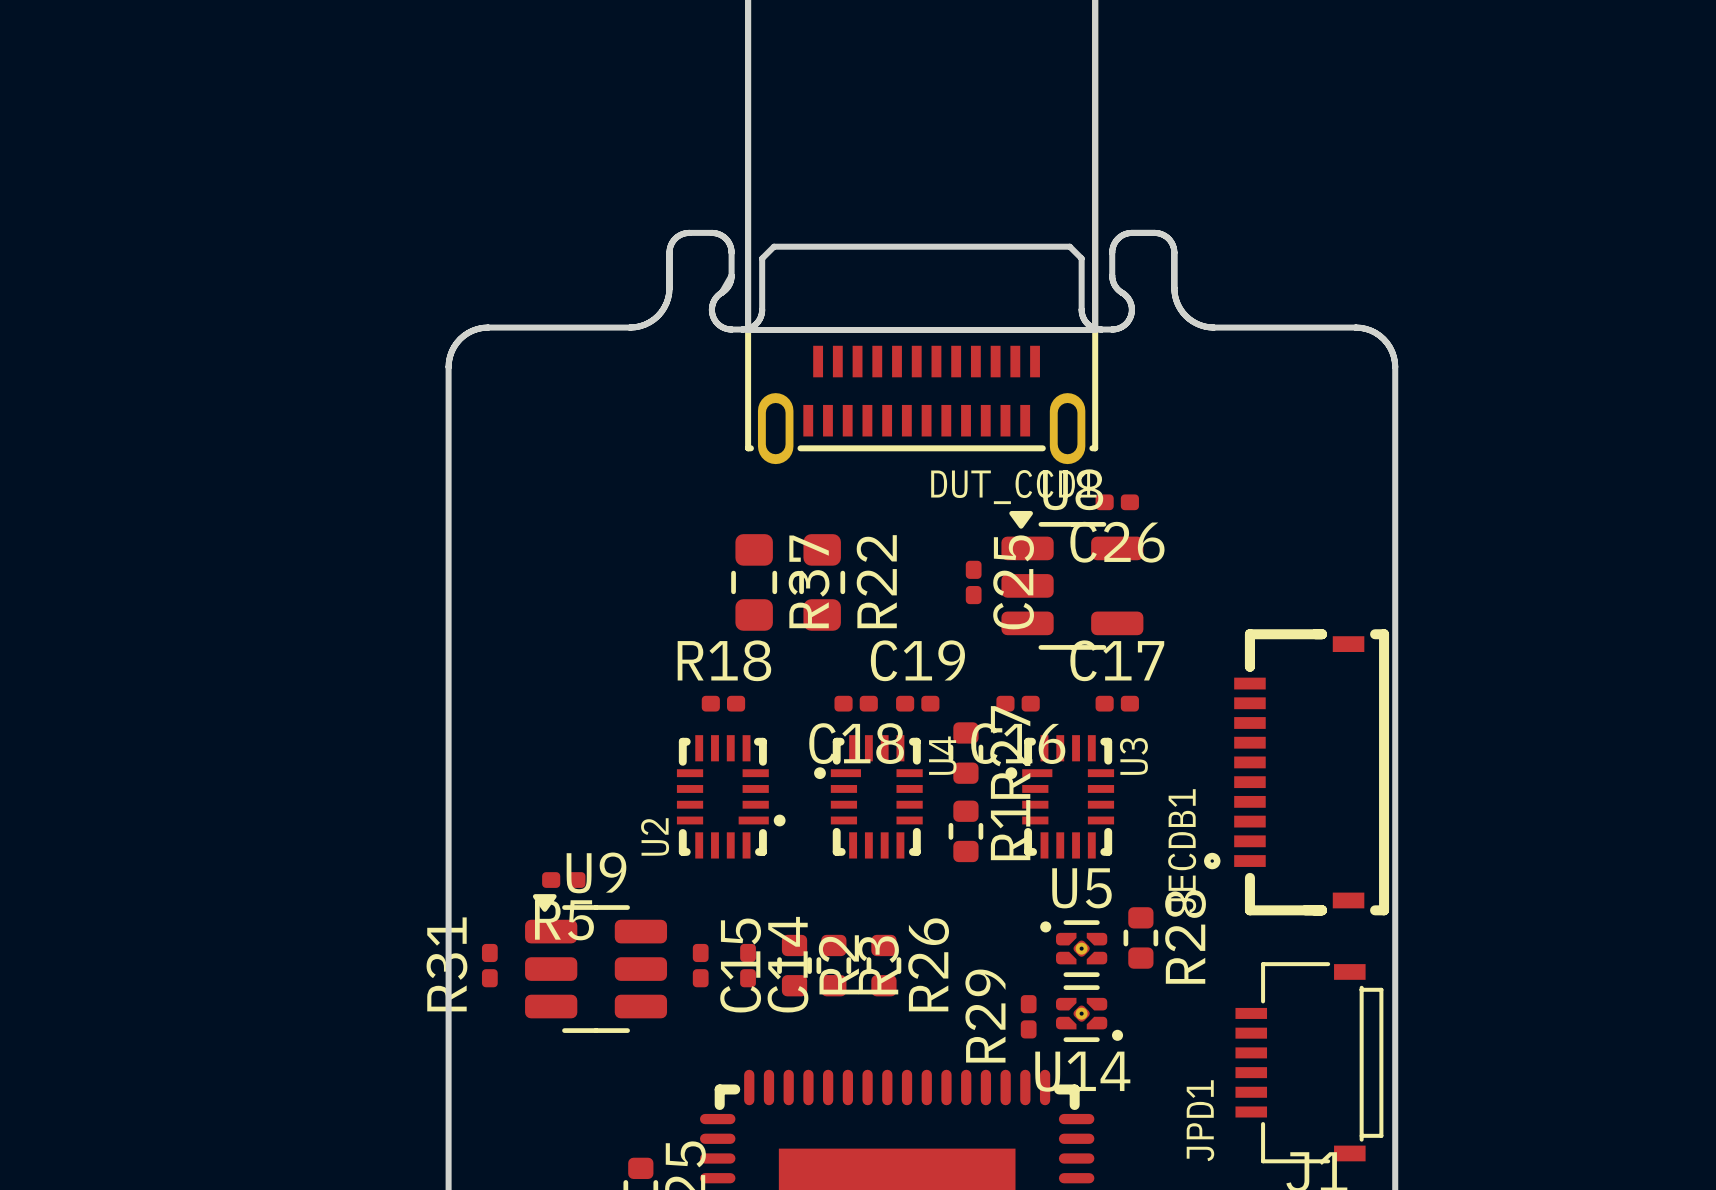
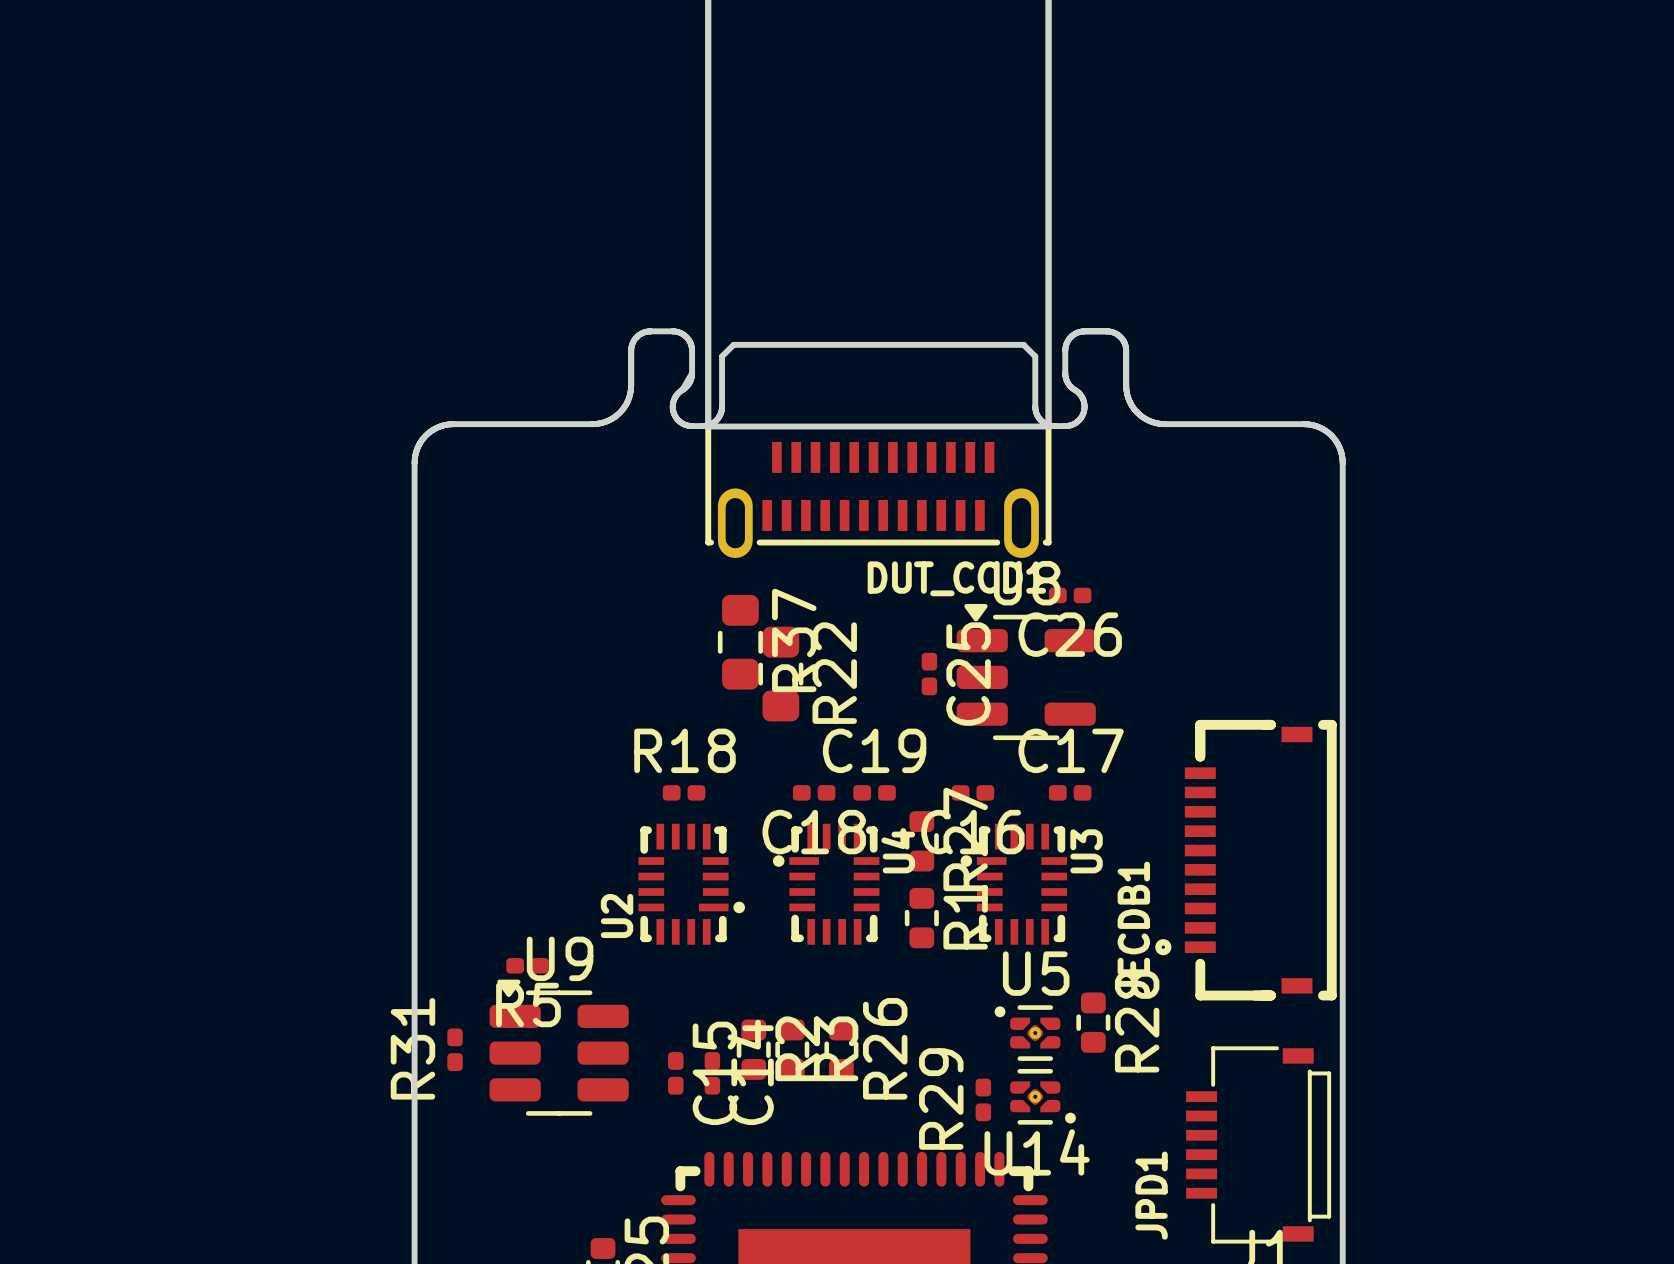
R37 position: (754, 582) -> (740, 642)
C15 position: (700, 965) -> (675, 1073)
C14 position: (748, 965) -> (712, 1073)

